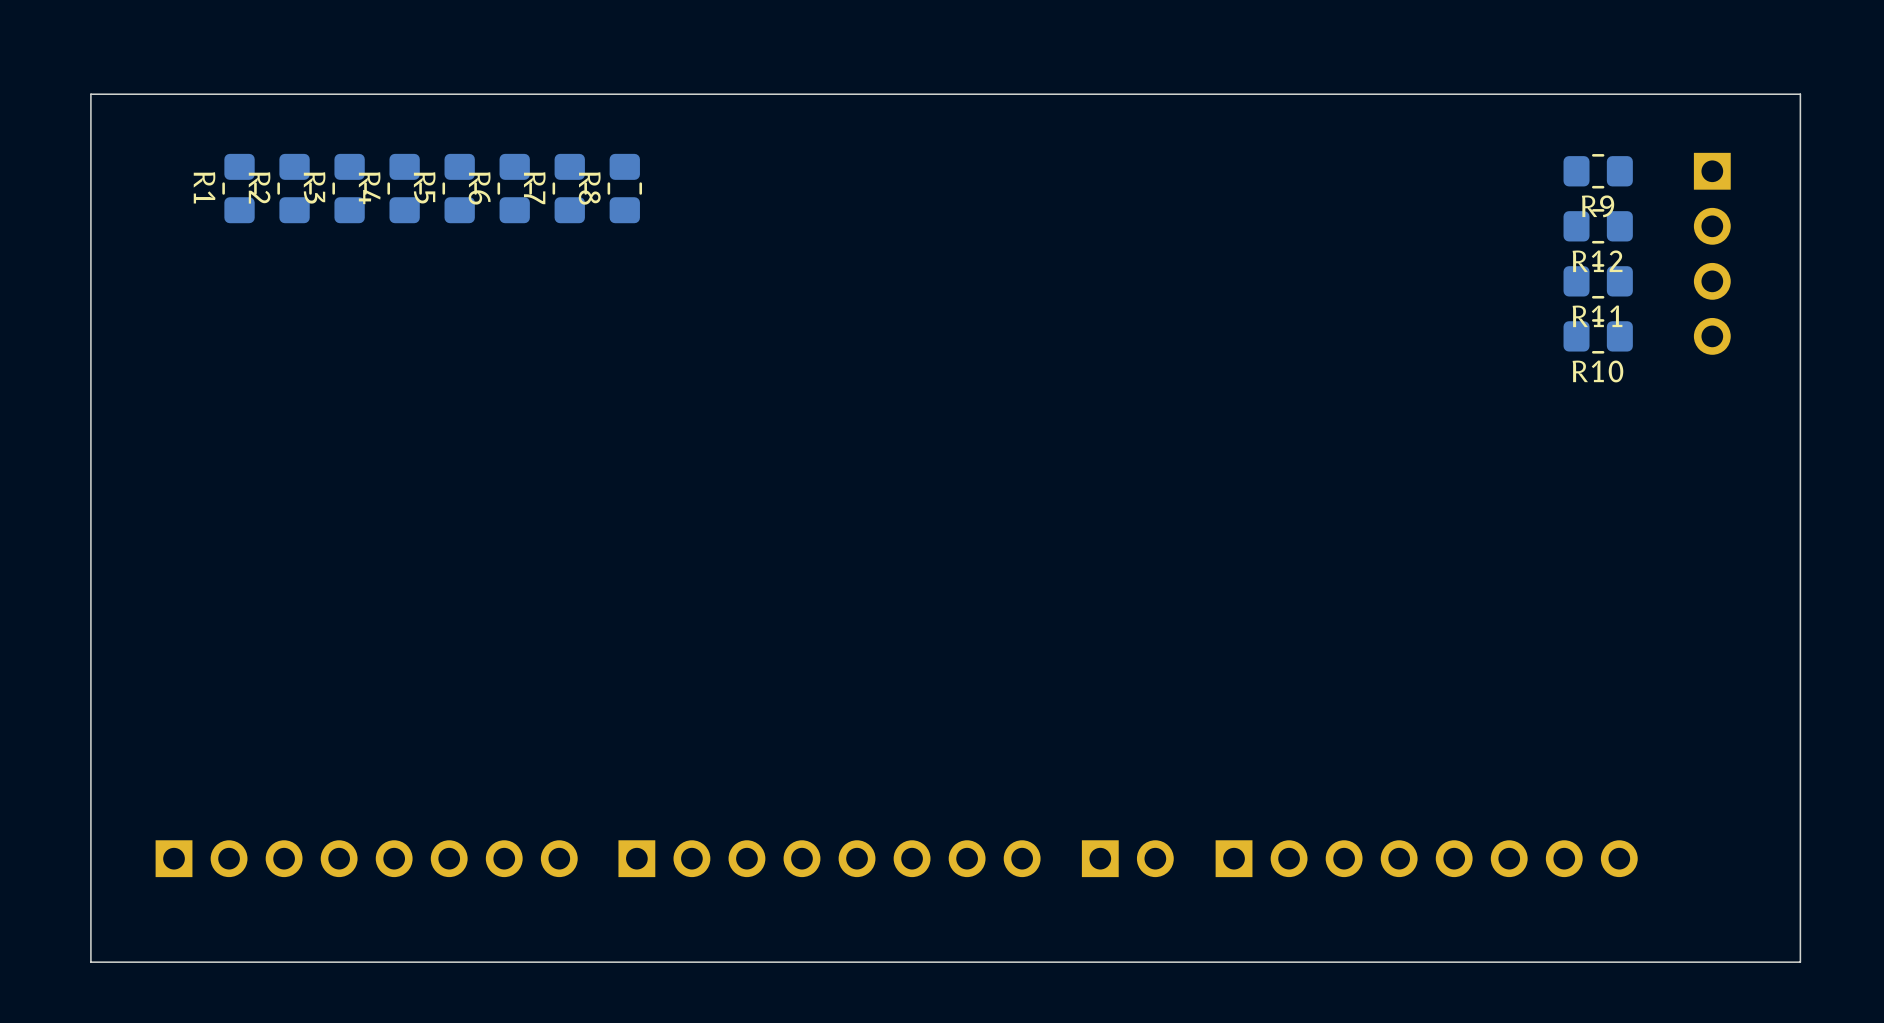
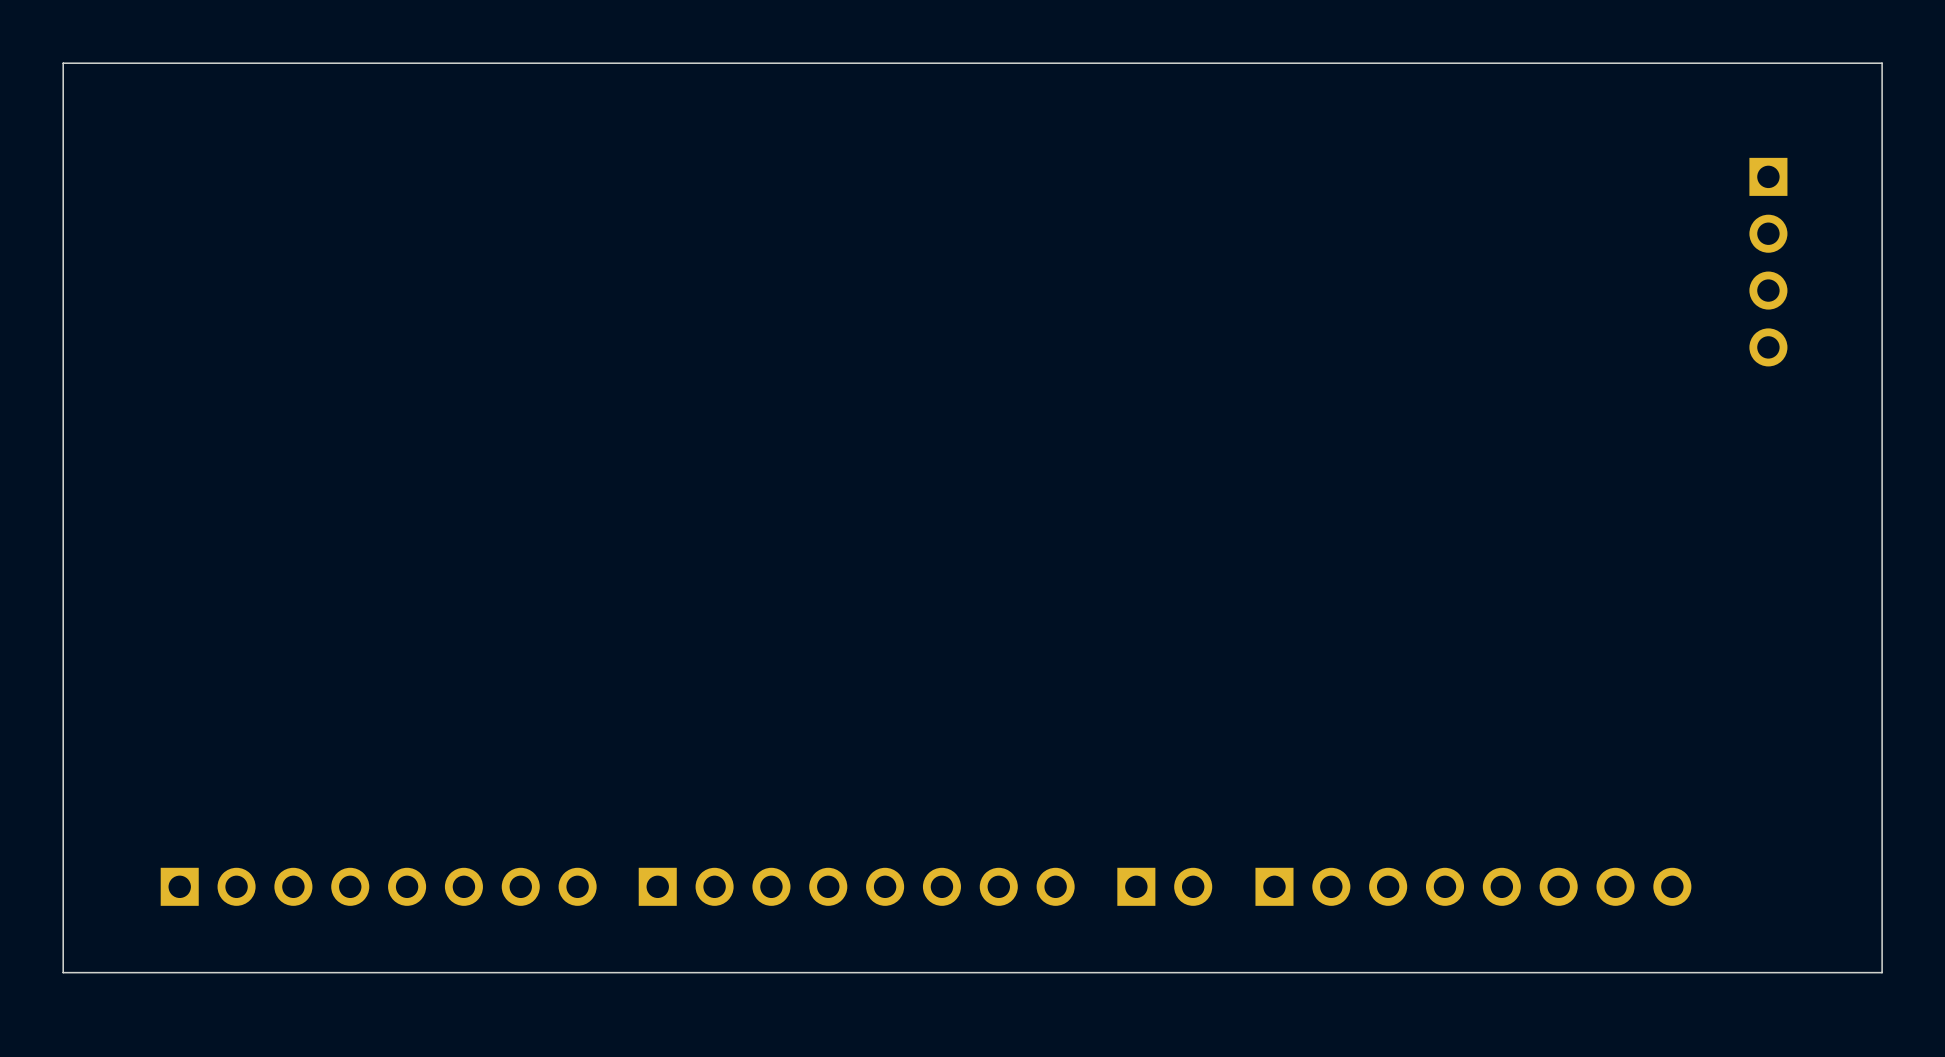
board edge: (1800, 94) (1800, 962) (90, 962) (90, 94) (1800, 94) -> (1882, 63) (1882, 972) (63, 972) (63, 63) (1882, 63)
R9: (1598, 171) -> none
R1: (239, 188) -> none
R2: (294, 188) -> none
R3: (349, 188) -> none
R4: (404, 188) -> none
R5: (459, 188) -> none
R6: (514, 188) -> none
R7: (569, 188) -> none
R8: (624, 188) -> none
R12: (1598, 226) -> none
R11: (1598, 281) -> none
R10: (1598, 336) -> none

